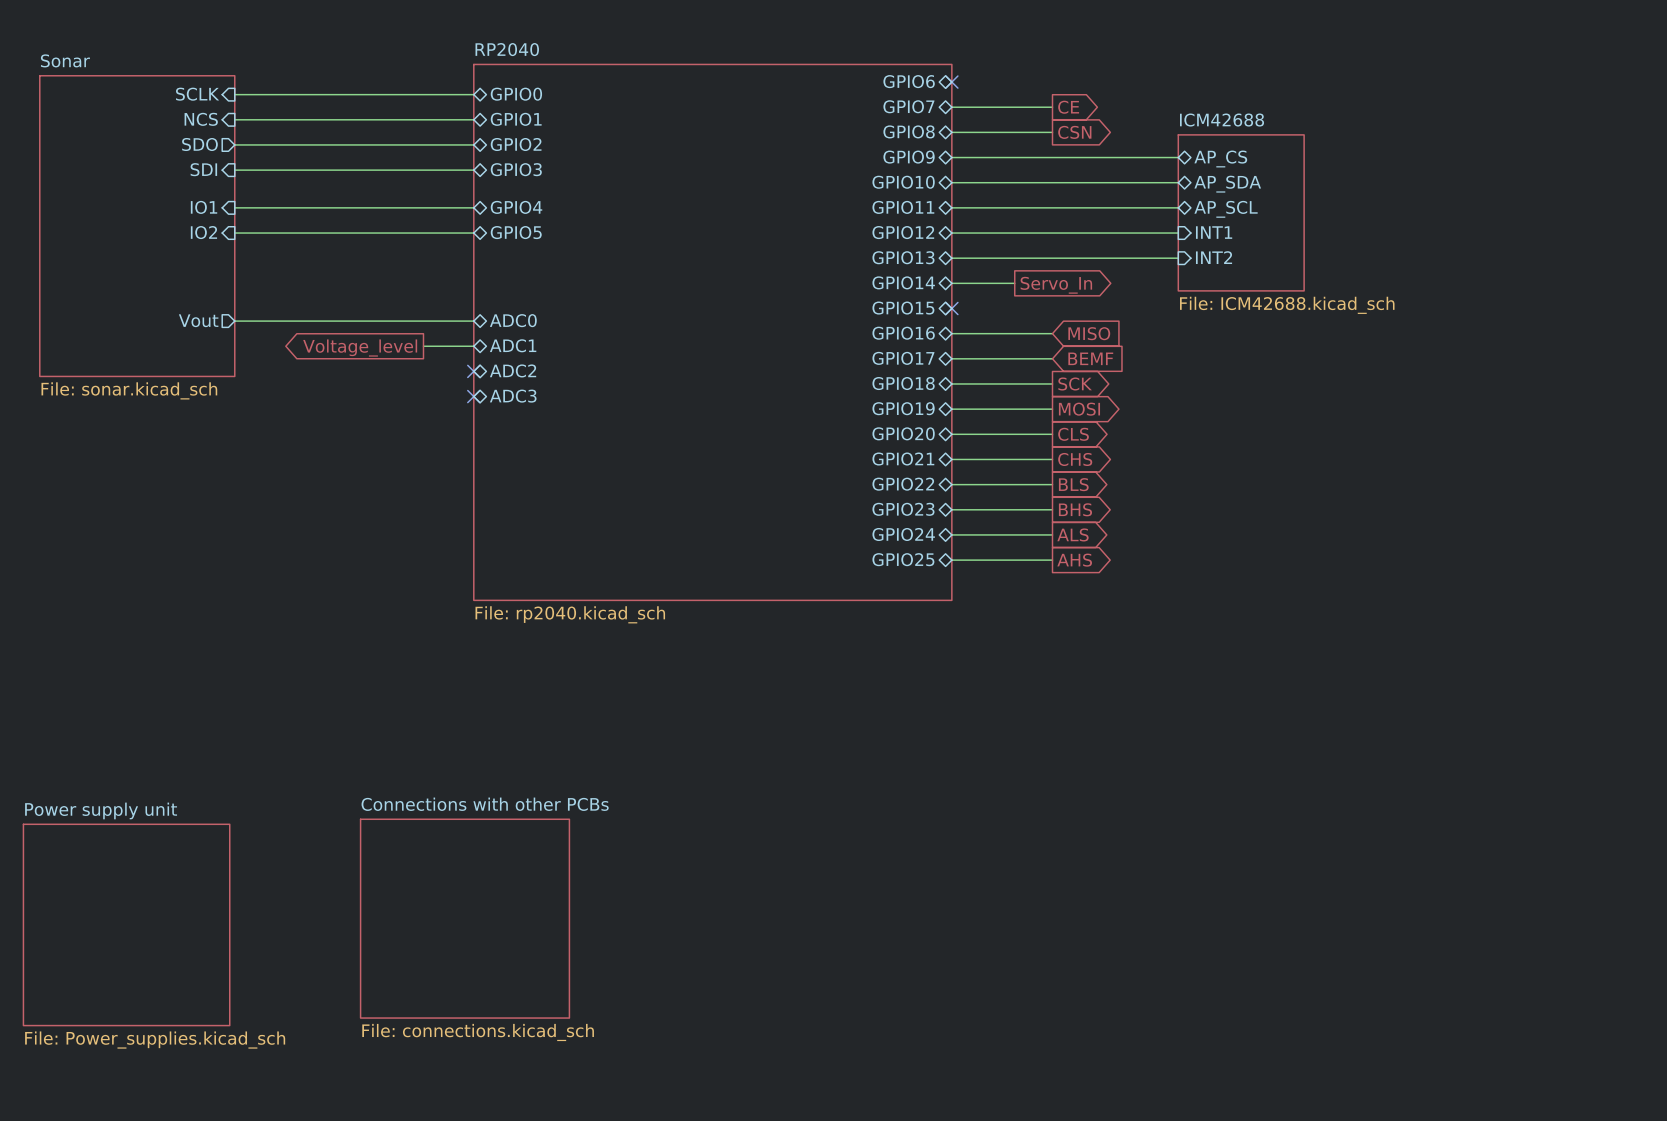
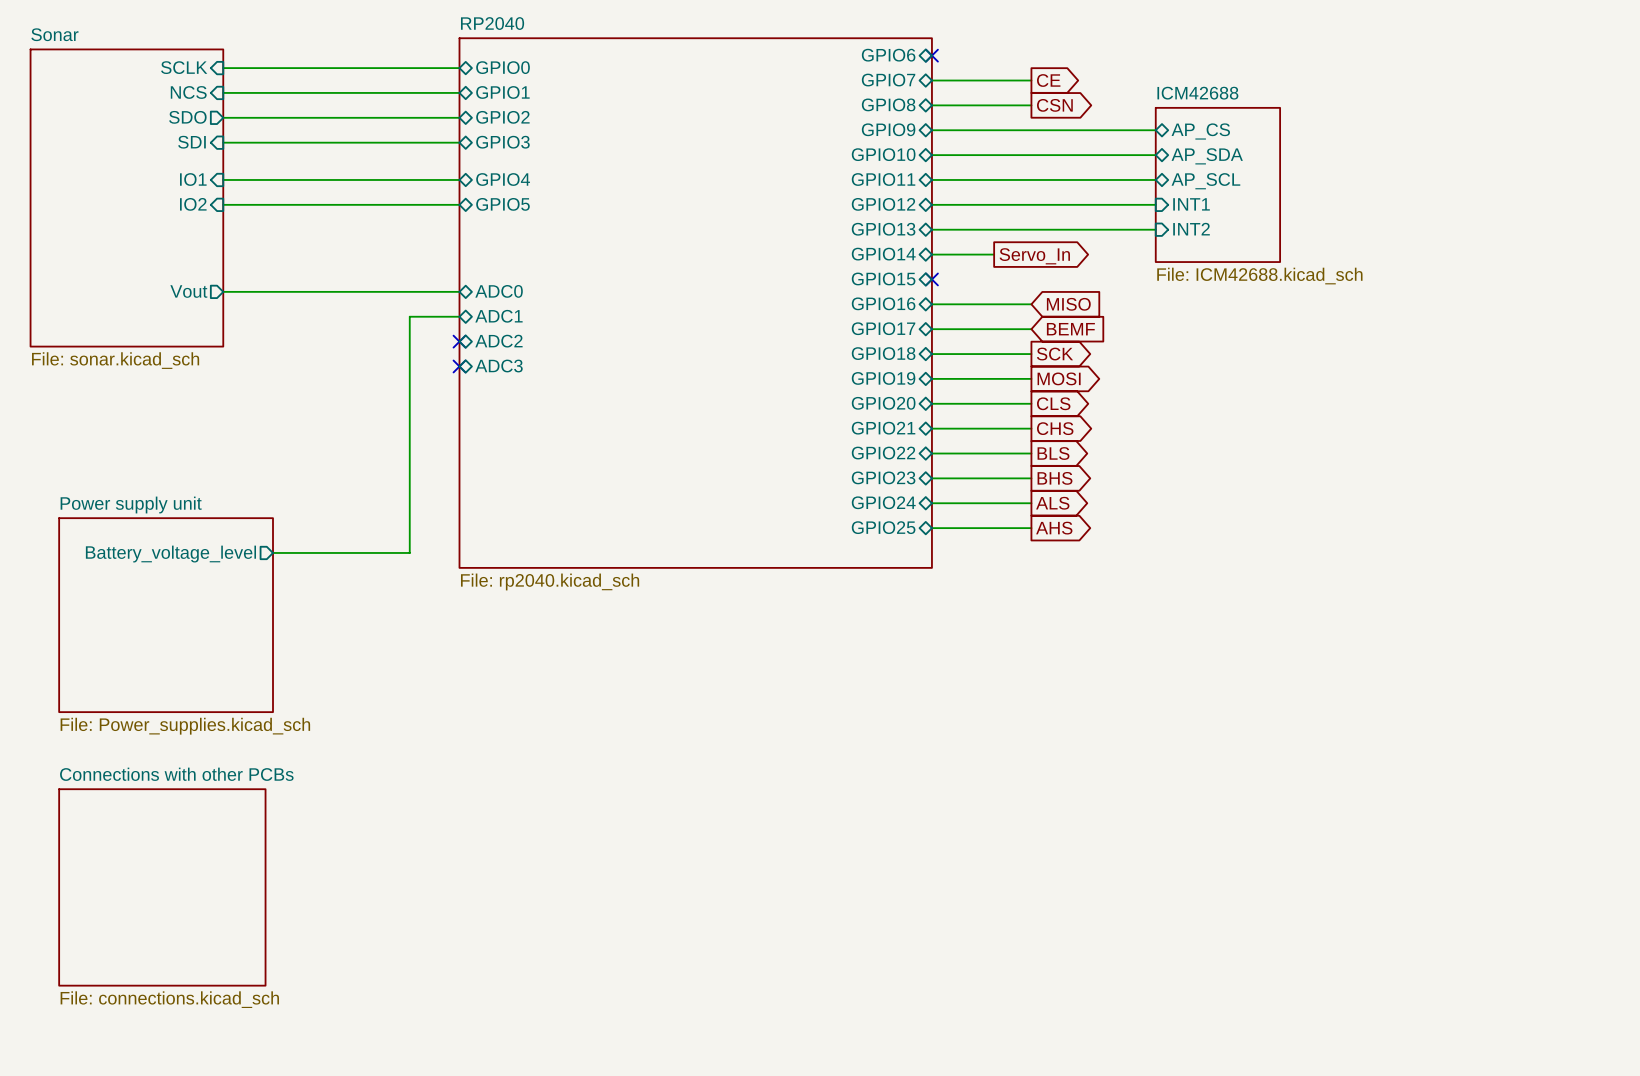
wire: none -> (409, 316) (409, 552) (273, 552)
global label: Voltage_level (360, 348) -> none
sheet pin: none -> Battery_voltage_level (170, 554)
sheet Power supply unit: none -> File: Power_supplies.kicad_sch (166, 615)
sheet Connections with other PCBs: File: connections.kicad_sch (465, 918) -> none
sheet Connections with other PCBs: none -> File: connections.kicad_sch (162, 887)
sheet Power supply unit: File: Power_supplies.kicad_sch (126, 924) -> none

